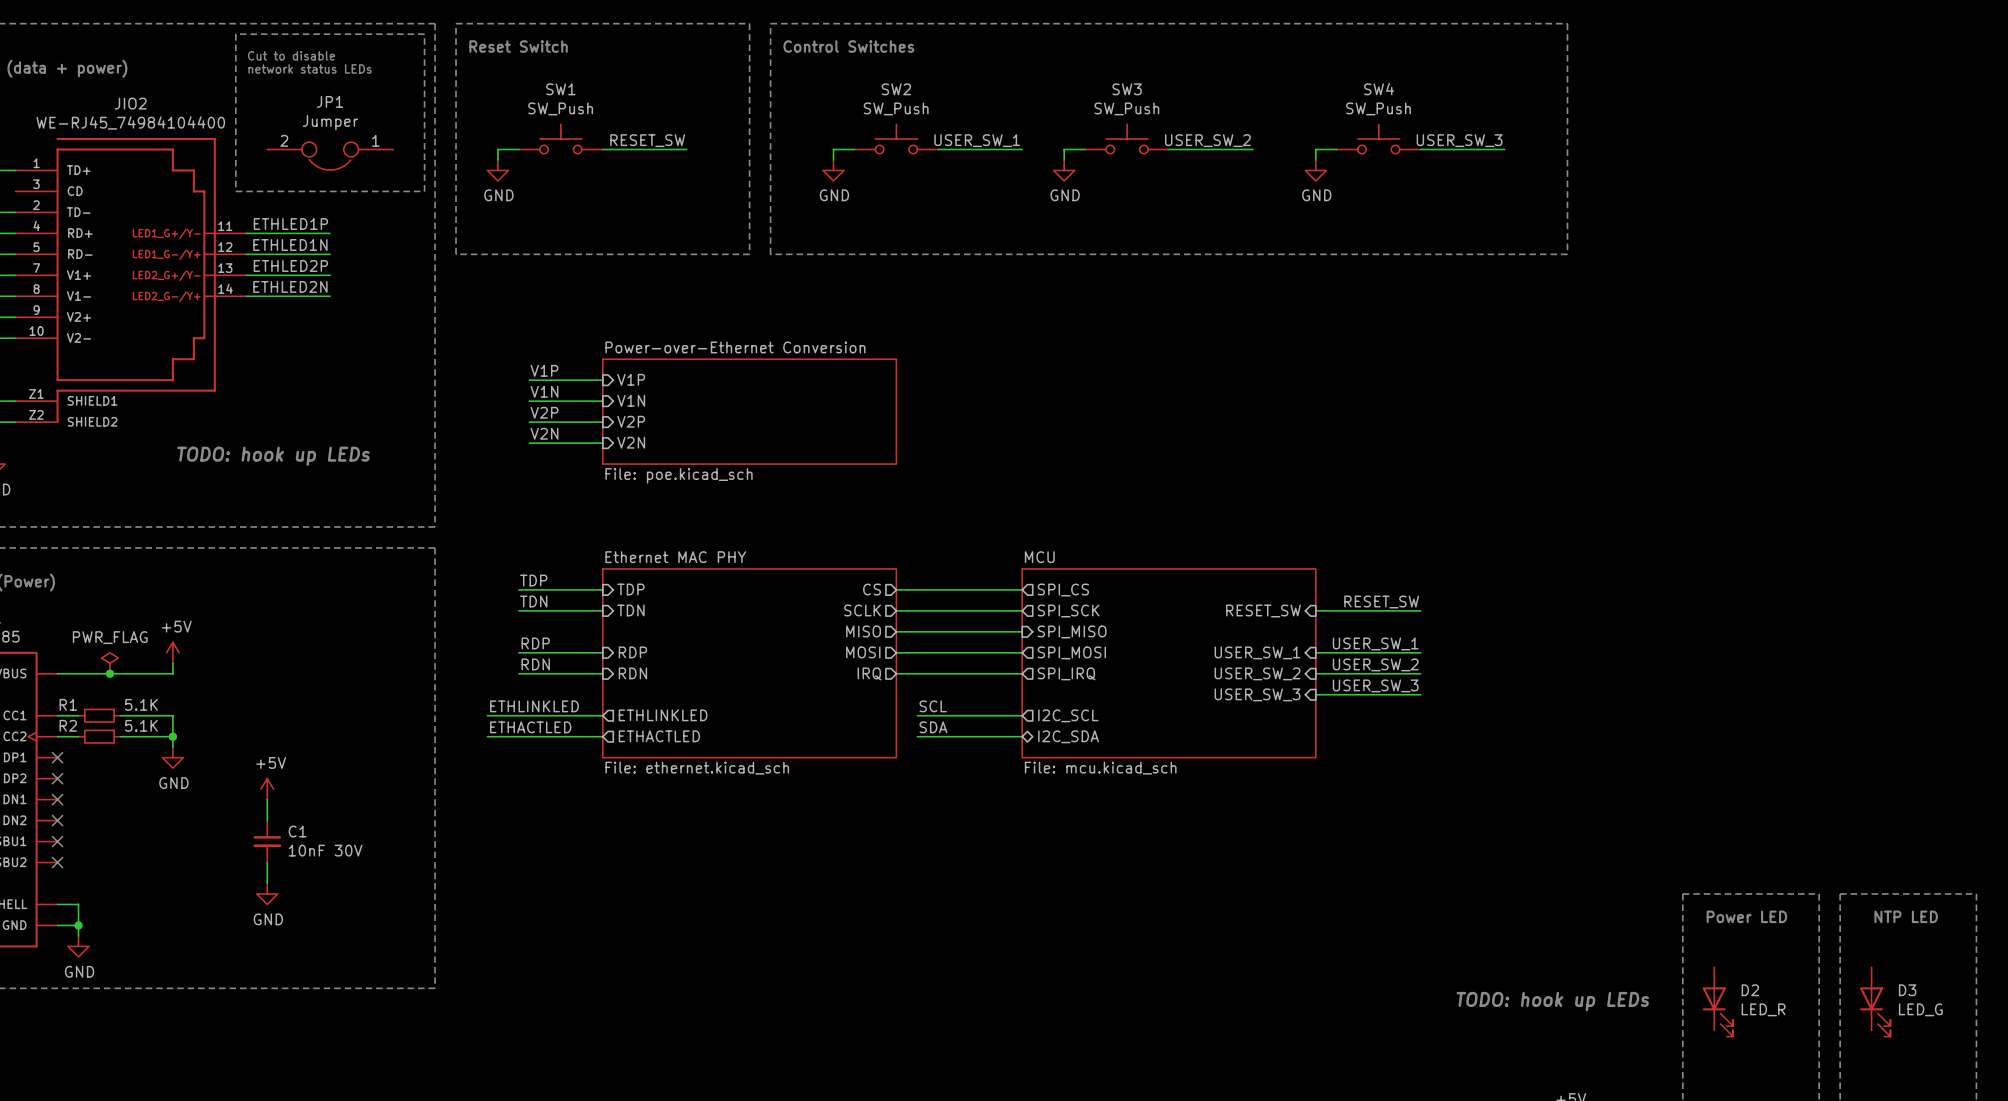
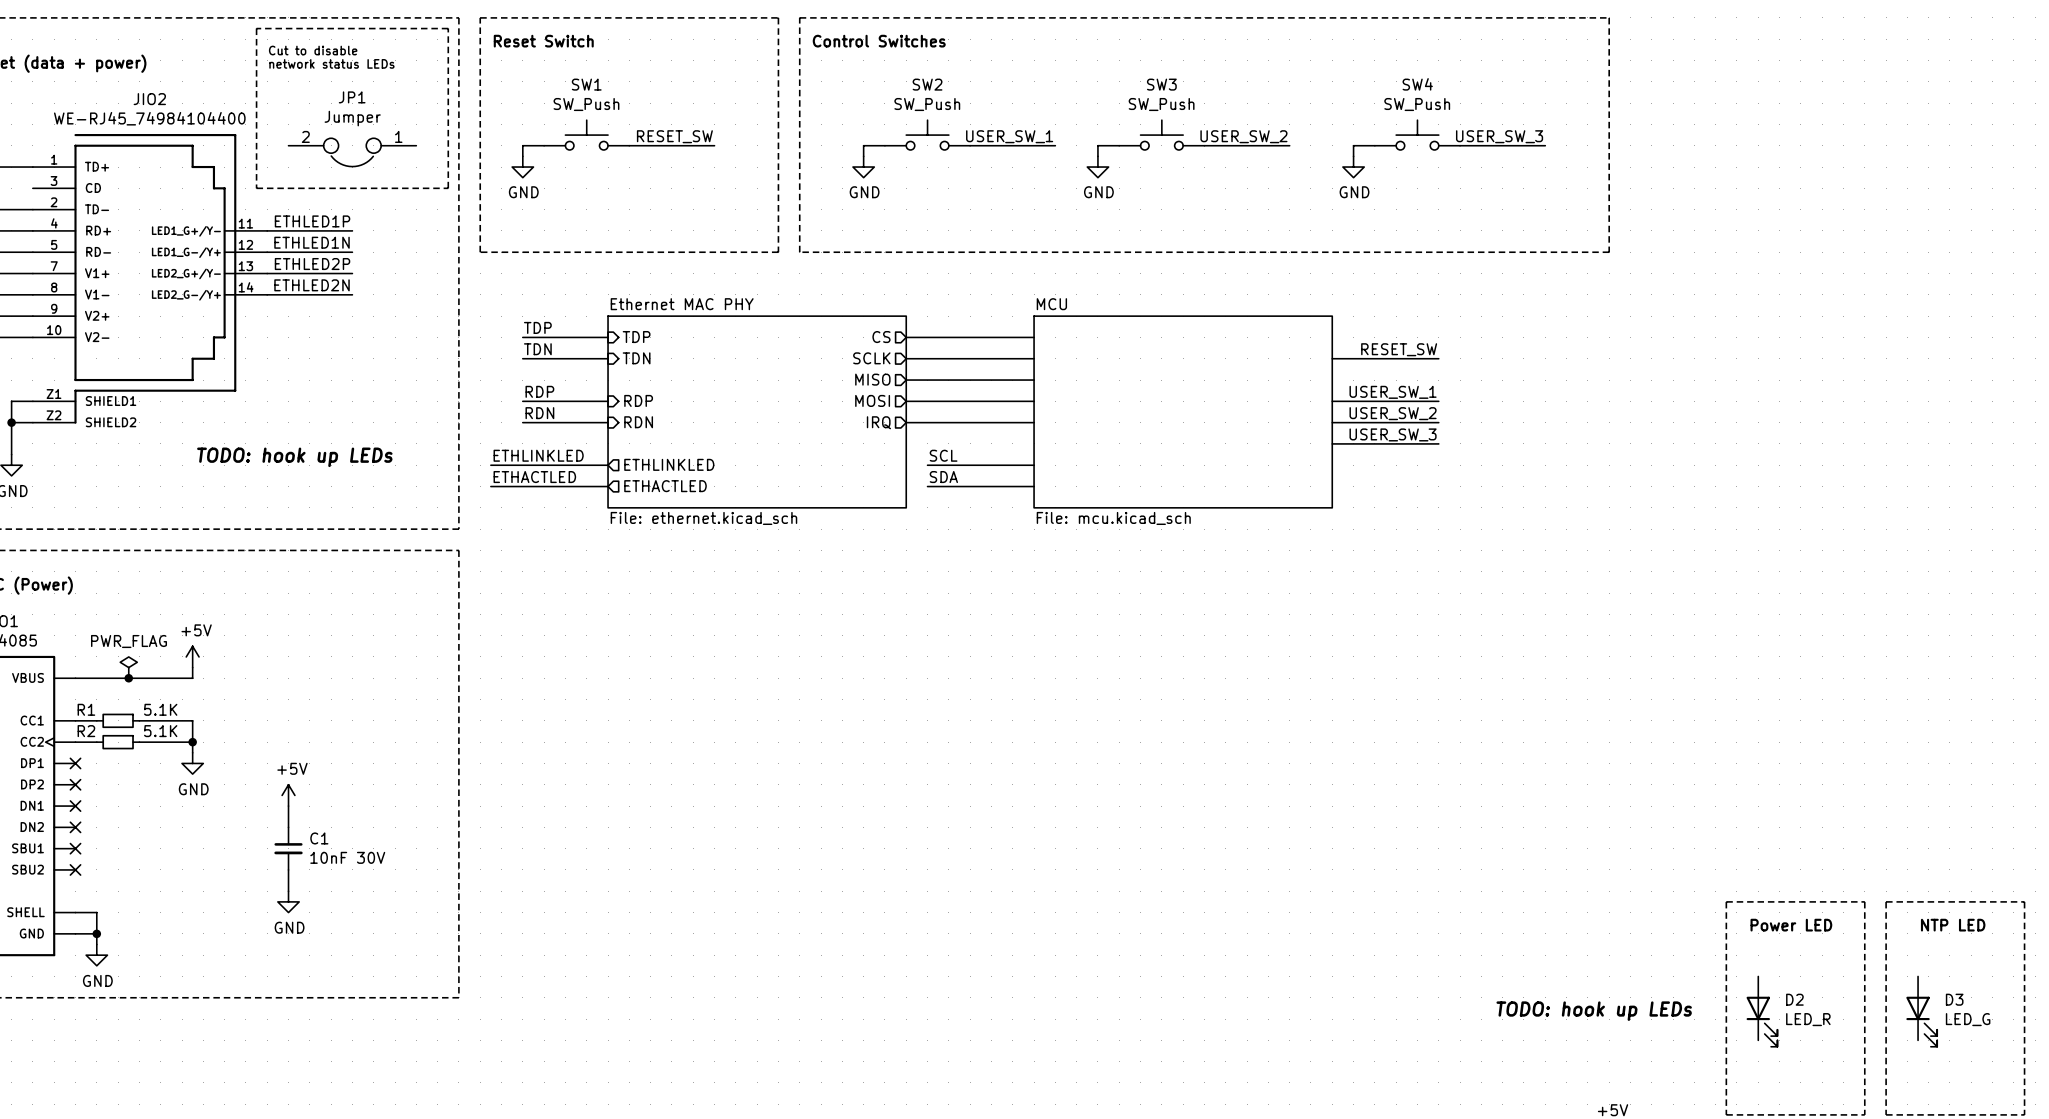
label: none -> TDP (537, 327)
sheet pin: none -> TDP (636, 337)
sheet pin: none -> CS (881, 337)
wire: none -> (522, 337) (608, 337)
wire: none -> (906, 337) (1034, 337)
label: none -> TDN (537, 349)
label: none -> RESET_SW (1399, 349)
sheet pin: none -> TDN (636, 358)
sheet pin: none -> SCLK (871, 358)
wire: none -> (522, 358) (608, 358)
wire: none -> (906, 358) (1034, 358)
wire: none -> (1332, 358) (1438, 358)
label: V1P (544, 370) -> none
sheet pin: V1P (631, 379) -> none
sheet pin: none -> MISO (872, 379)
wire: (529, 380) (602, 380) -> none
wire: none -> (906, 380) (1034, 380)
label: none -> RDP (539, 391)
label: V1N (544, 391) -> none
label: none -> USER_SW_1 (1393, 392)
sheet pin: none -> RDP (638, 400)
sheet pin: V1N (631, 400) -> none
sheet pin: none -> MOSI (872, 400)
wire: none -> (522, 401) (554, 401)
wire: (581, 401) (602, 401) -> none
wire: none -> (1332, 401) (1438, 401)
sheet Ethernet MAC PHY: none -> File: ethernet.kicad_sch (757, 411)
sheet Power-over-Ethernet Conversion: File: poe.kicad_sch (749, 411) -> none
sheet MCU: none -> File: mcu.kicad_sch (1183, 411)
label: none -> RDN (539, 413)
label: V2P (544, 412) -> none
label: none -> USER_SW_2 (1393, 413)
sheet pin: none -> RDN (638, 422)
sheet pin: V2P (631, 421) -> none
wire: none -> (522, 422) (554, 422)
wire: (581, 422) (602, 422) -> none
sheet pin: none -> IRQ (878, 422)
label: V2N (544, 433) -> none
label: none -> USER_SW_3 (1393, 434)
sheet pin: V2N (631, 442) -> none
wire: (529, 443) (602, 443) -> none
wire: none -> (1332, 443) (1438, 443)
label: none -> ETHLINKLED (538, 455)
label: none -> SCL (943, 455)
sheet pin: none -> ETHLINKLED (669, 464)
wire: none -> (490, 465) (608, 465)
wire: none -> (927, 465) (1034, 465)
label: none -> ETHACTLED (534, 477)
label: none -> SDA (943, 477)
sheet pin: none -> ETHACTLED (665, 486)
wire: none -> (490, 486) (608, 486)
wire: none -> (927, 486) (1034, 486)
label: TDP (533, 580) -> none
wire: (518, 589) (602, 589) -> none
sheet pin: TDP (630, 589) -> none
sheet pin: CS (872, 589) -> none
wire: (896, 589) (1022, 589) -> (906, 401) (1034, 401)
sheet pin: SPI_CS (1063, 590) -> none
label: TDN (533, 601) -> none
label: RESET_SW (1381, 602) -> none
wire: (518, 610) (602, 610) -> none
sheet pin: TDN (630, 610) -> none
sheet pin: SCLK (862, 610) -> none
wire: (896, 610) (1022, 610) -> (906, 422) (1034, 422)
sheet pin: SPI_SCK (1068, 610) -> none
sheet pin: RESET_SW (1263, 610) -> none
wire: (1315, 610) (1420, 610) -> (1332, 422) (1438, 422)
sheet pin: MISO (863, 631) -> none
wire: (896, 631) (1022, 631) -> none
sheet pin: SPI_MISO (1072, 631) -> none
label: RDP (535, 643) -> none
label: USER_SW_1 (1375, 643) -> none
wire: (518, 652) (602, 652) -> none
sheet pin: RDP (632, 652) -> none
sheet pin: MOSI (863, 652) -> none
wire: (896, 652) (1022, 652) -> none
sheet pin: SPI_MOSI (1071, 652) -> none
sheet pin: USER_SW_1 (1257, 652) -> none
wire: (1315, 652) (1420, 652) -> none
sheet Ethernet MAC PHY: File: ethernet.kicad_sch (749, 663) -> none
sheet MCU: File: mcu.kicad_sch (1169, 663) -> none
label: RDN (535, 664) -> none
label: USER_SW_2 (1375, 664) -> none
wire: (518, 673) (602, 673) -> none
sheet pin: RDN (632, 673) -> none
sheet pin: IRQ (869, 673) -> none
wire: (896, 673) (1022, 673) -> none
sheet pin: SPI_IRQ (1066, 673) -> none
sheet pin: USER_SW_2 (1257, 673) -> none
wire: (1315, 673) (1420, 673) -> none
label: USER_SW_3 (1375, 685) -> none
sheet pin: USER_SW_3 (1257, 694) -> none
wire: (1315, 694) (1420, 694) -> none
label: ETHLINKLED (534, 706) -> none
label: SCL (933, 706) -> none
wire: (487, 715) (602, 715) -> none
sheet pin: ETHLINKLED (663, 715) -> none
wire: (917, 715) (1022, 715) -> none
sheet pin: I2C_SCL (1068, 715) -> none
label: ETHACTLED (530, 727) -> none
label: SDA (933, 727) -> none
wire: (487, 736) (602, 736) -> none
sheet pin: ETHACTLED (659, 736) -> none
wire: (917, 736) (1022, 736) -> none
sheet pin: I2C_SDA (1068, 736) -> none

